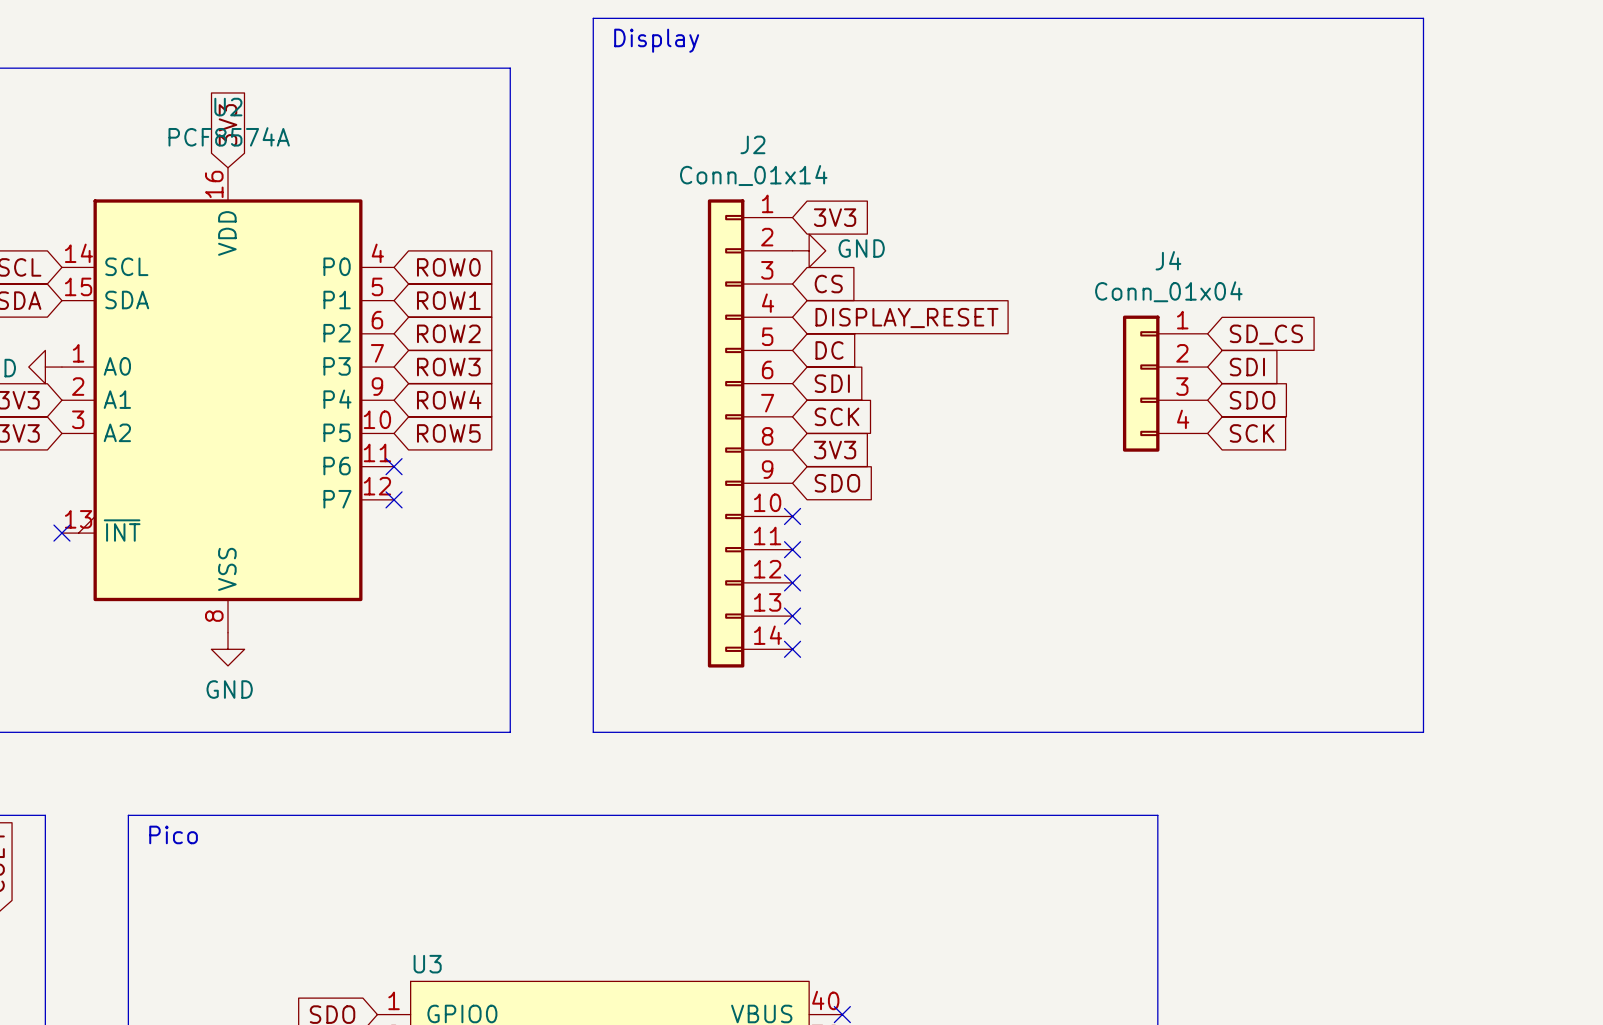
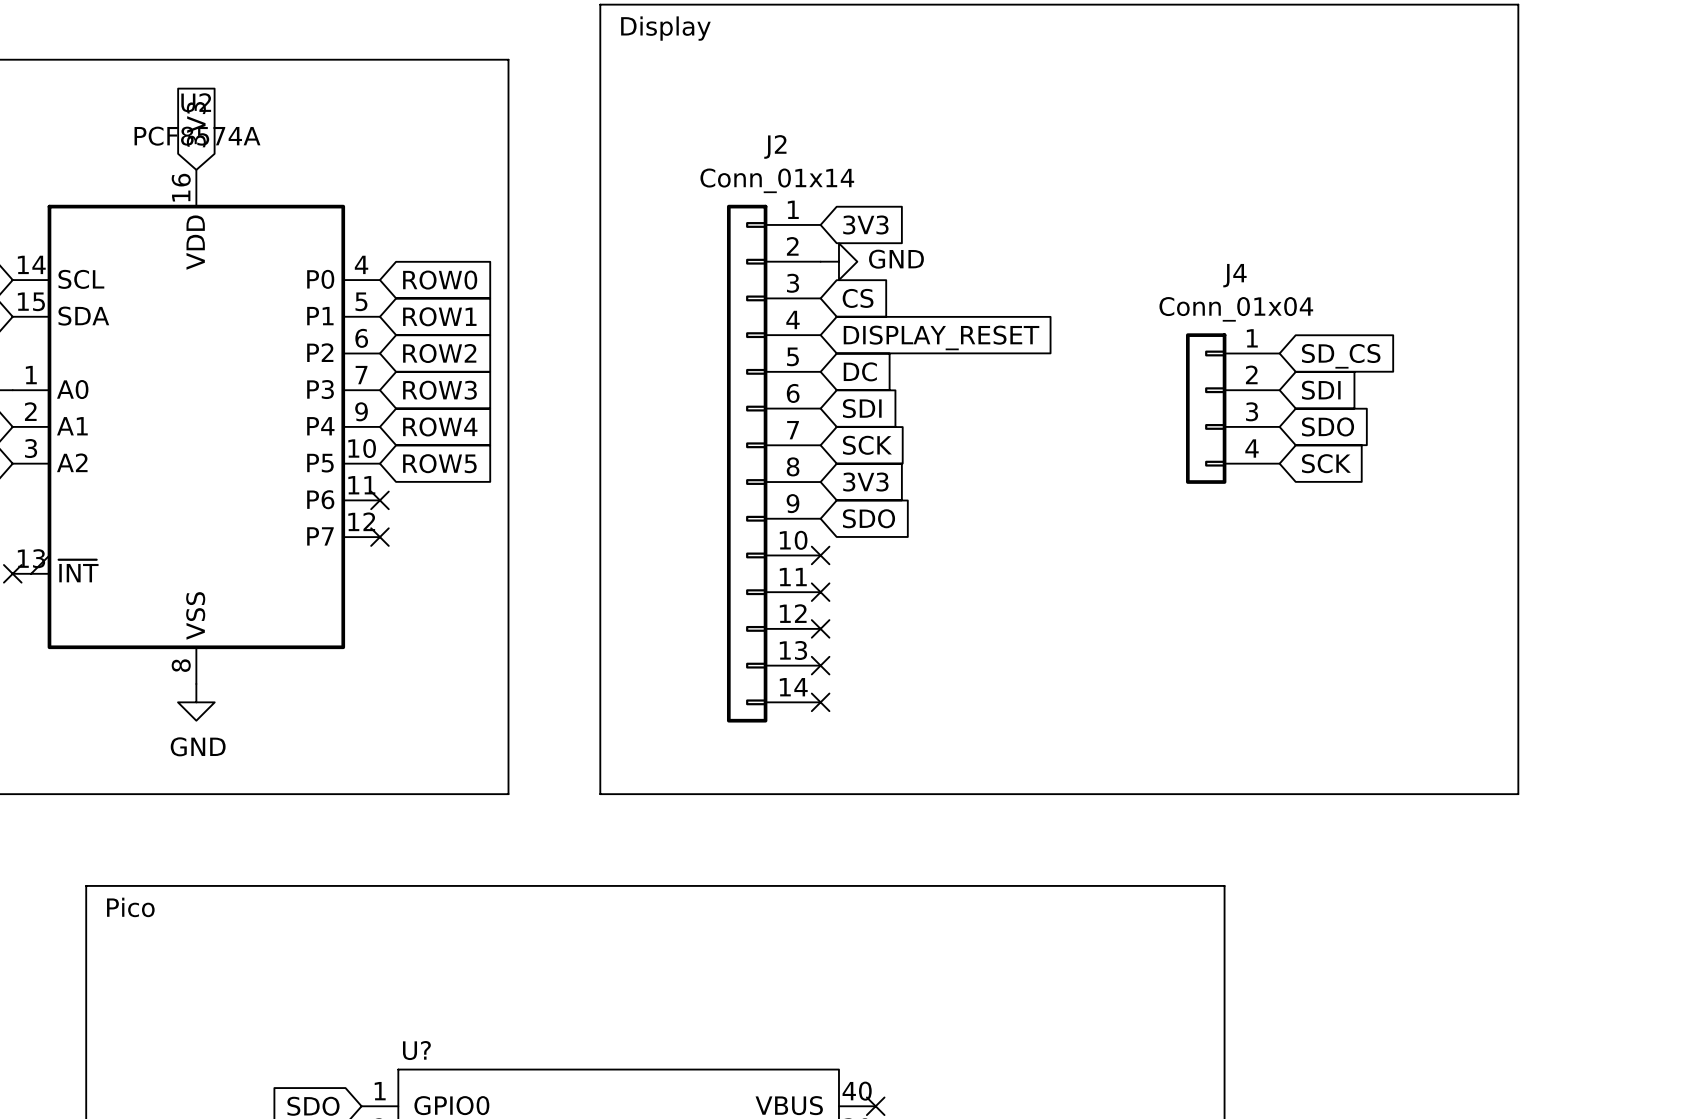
U3 name: U3 (427, 964) -> U? (416, 1050)

